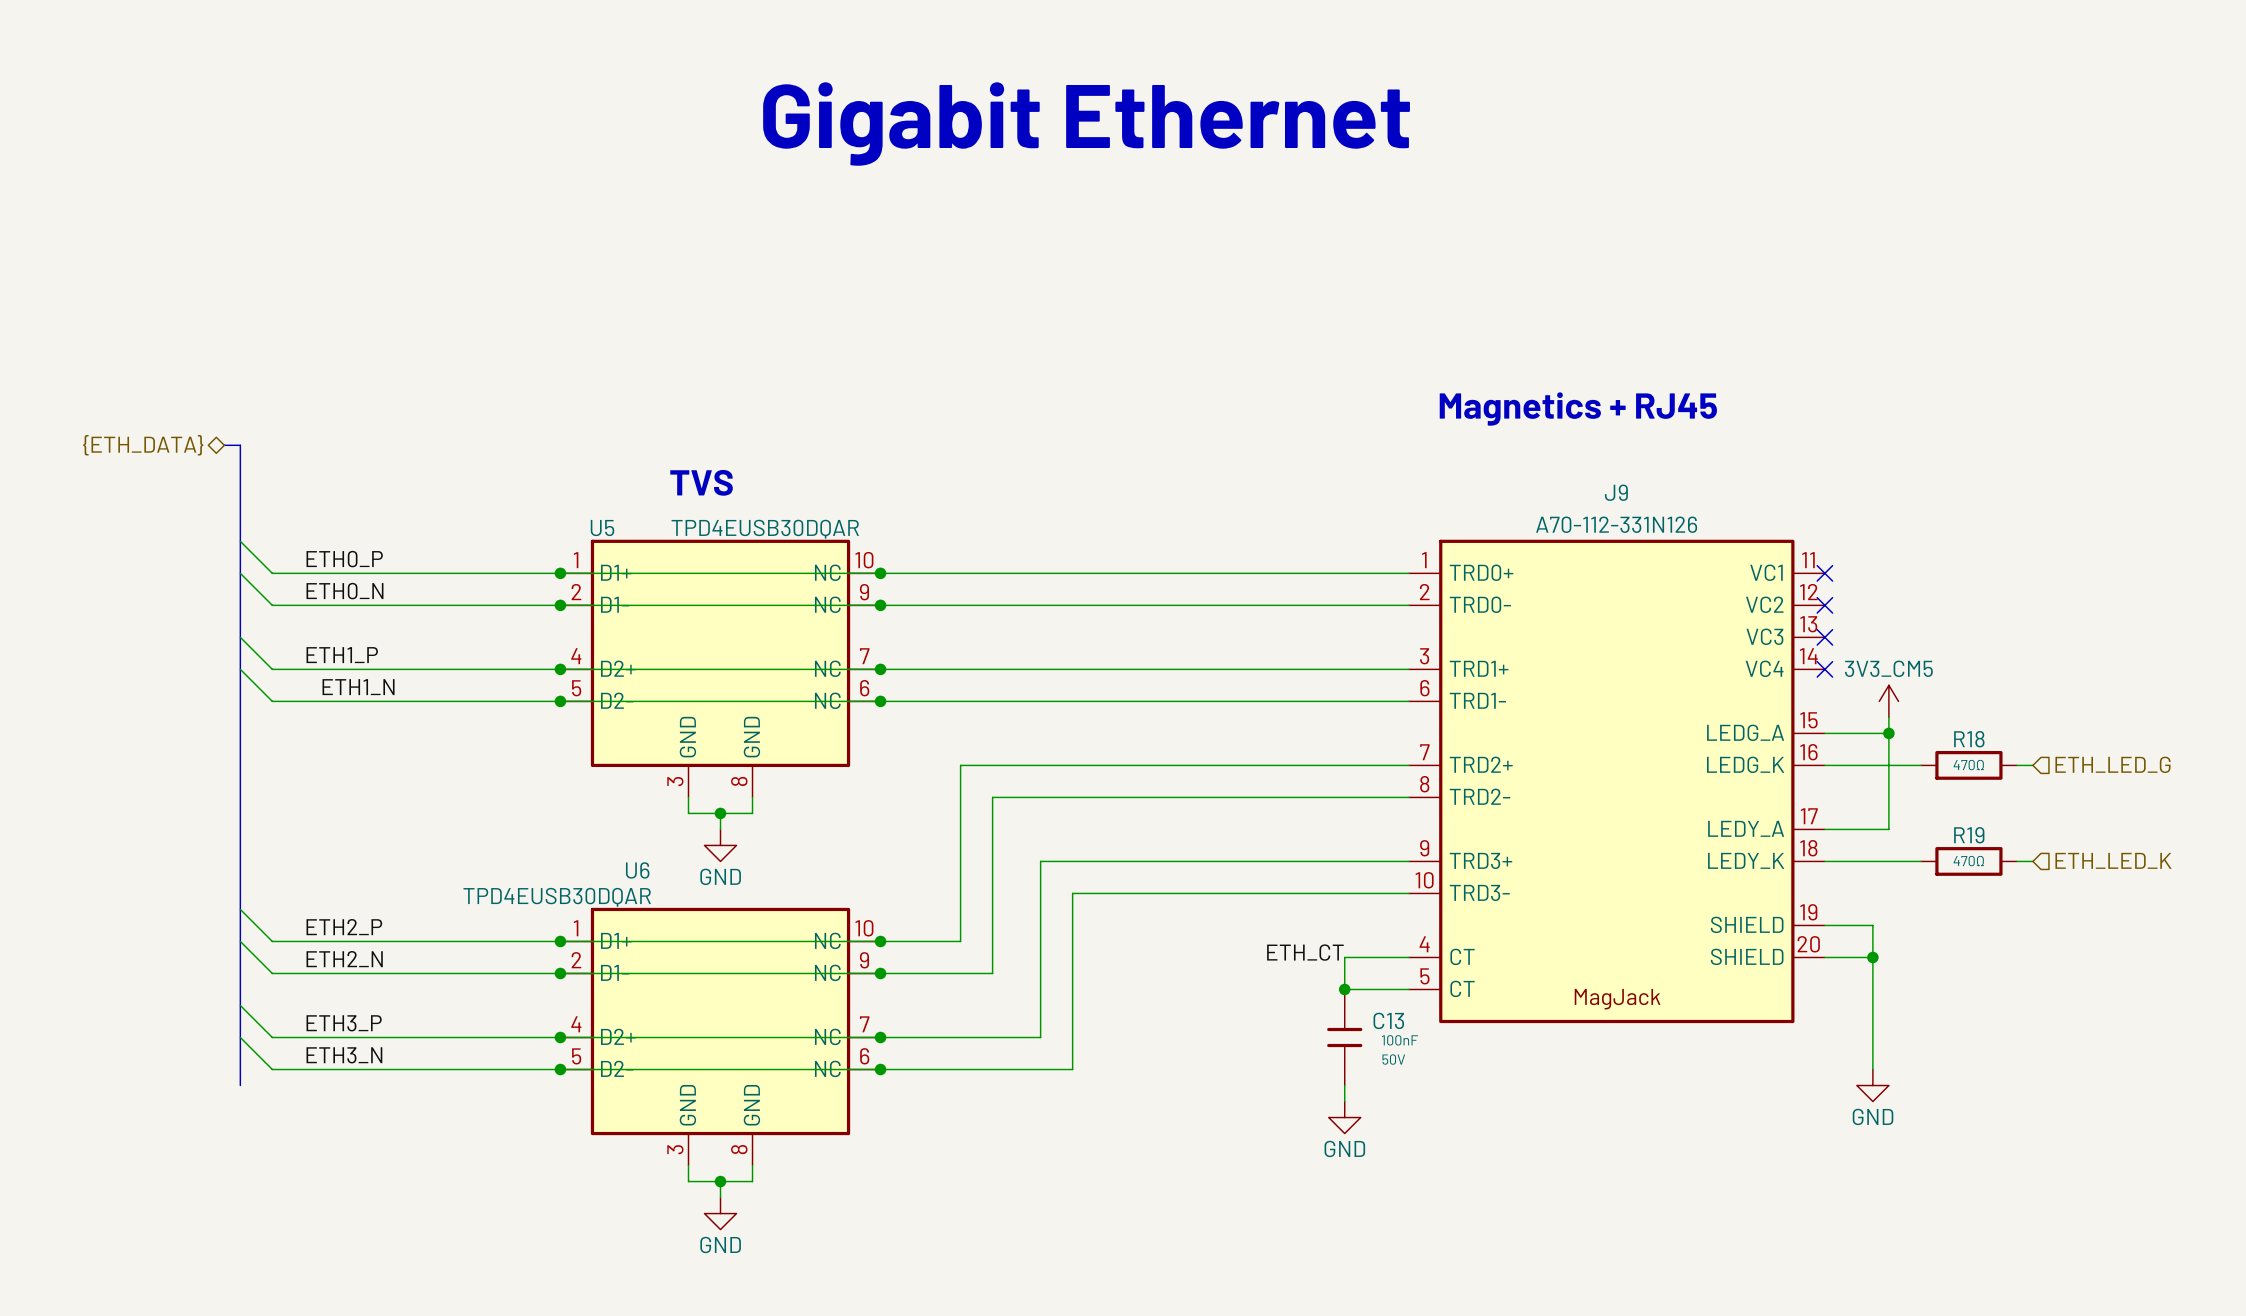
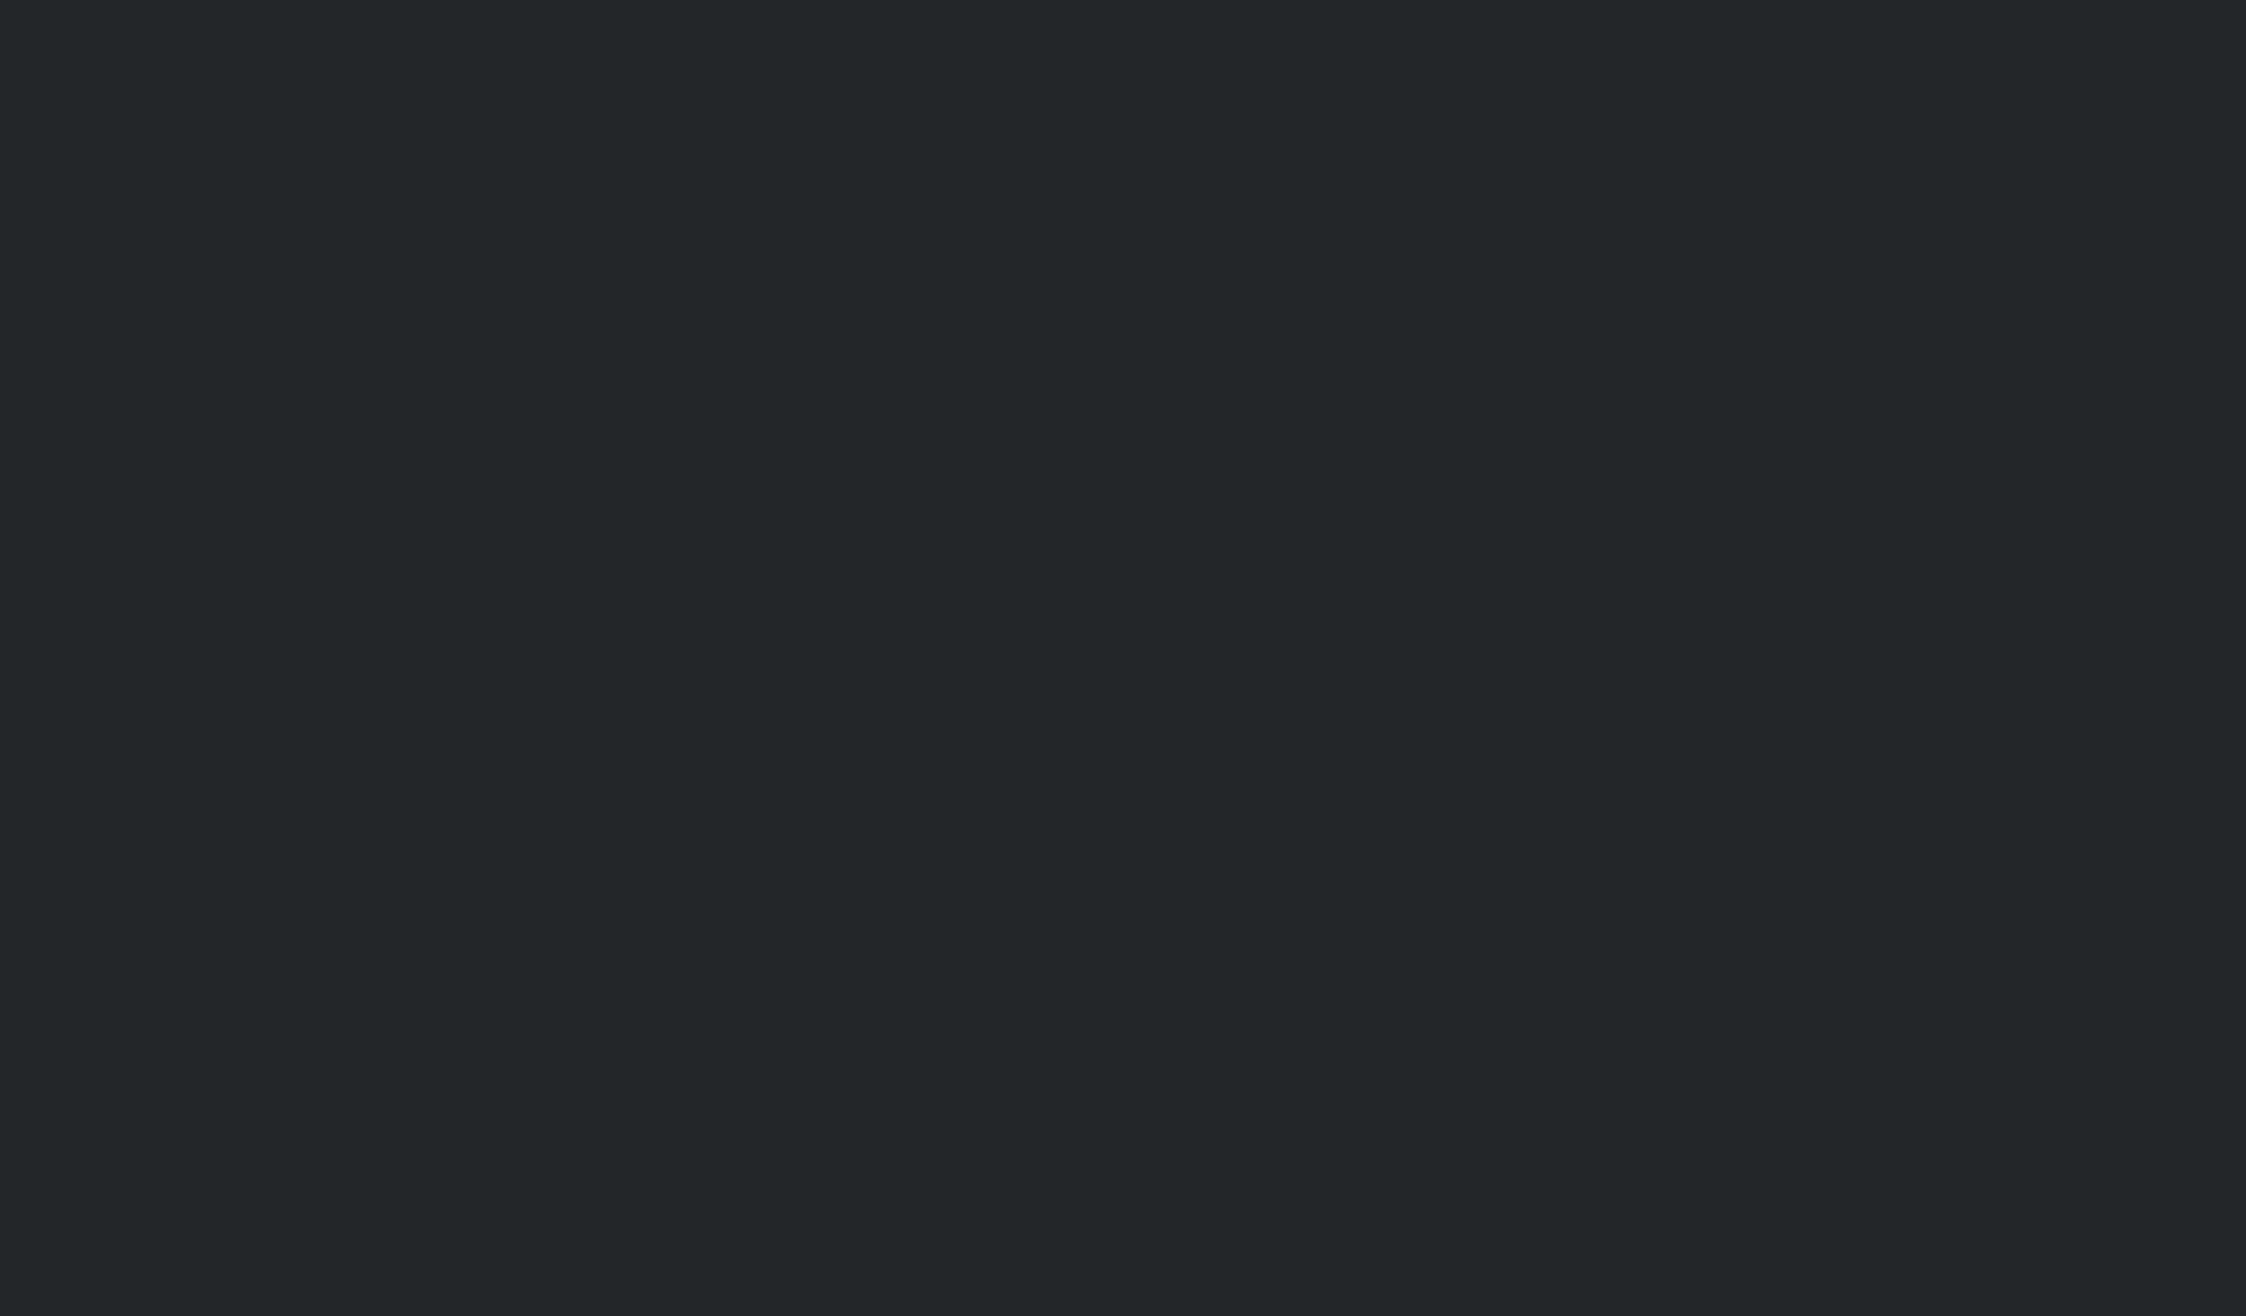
text: Gigabit Ethernet (1086, 124) -> none
text: Magnetics + RJ45 (1578, 409) -> none
hierarchical label: {ETH_DATA} (143, 445) -> none
bus: (224, 445) (240, 445) (240, 1085) -> none
text: TVS (701, 482) -> none
wire: (240, 541) (272, 573) (1408, 573) -> none
label: ETH0_P (344, 559) -> none
wire: (240, 573) (272, 605) (1408, 605) -> none
junction: (560, 573) -> none
junction: (880, 573) -> none
no-connect mark: (1824, 573) -> none
label: ETH0_N (344, 591) -> none
junction: (560, 605) -> none
junction: (880, 605) -> none
no-connect mark: (1824, 605) -> none
wire: (240, 637) (272, 669) (1408, 669) -> none
no-connect mark: (1824, 637) -> none
label: ETH1_P (342, 655) -> none
U5: TPD4EUSB30DQAR (720, 668) -> none
wire: (240, 669) (272, 701) (1408, 701) -> none
junction: (560, 669) -> none
junction: (880, 669) -> none
no-connect mark: (1824, 669) -> none
label: ETH1_N (358, 687) -> none
junction: (560, 701) -> none
junction: (880, 701) -> none
power symbol: 3V3_CM5 (1888, 701) -> none
wire: (1888, 717) (1888, 829) (1824, 829) -> none
wire: (1824, 733) (1888, 733) -> none
junction: (1888, 733) -> none
hierarchical label: ETH_LED_G (2112, 764) -> none
wire: (1408, 765) (960, 765) (960, 941) (272, 941) (240, 909) -> none
wire: (1824, 765) (1920, 765) -> none
R18: 470Ω (1968, 765) -> none
wire: (2016, 765) (2032, 765) -> none
J9: A70-112-331N126 (1616, 781) -> none
wire: (688, 797) (688, 813) (752, 813) (752, 797) -> none
wire: (1408, 797) (992, 797) (992, 973) (272, 973) (240, 941) -> none
wire: (720, 813) (720, 829) -> none
junction: (720, 813) -> none
power symbol: GND (720, 845) -> none
hierarchical label: ETH_LED_K (2113, 860) -> none
wire: (1408, 861) (1040, 861) (1040, 1037) (272, 1037) (240, 1005) -> none
wire: (1824, 861) (1920, 861) -> none
R19: 470Ω (1968, 861) -> none
wire: (2016, 861) (2032, 861) -> none
wire: (1408, 893) (1072, 893) (1072, 1069) (272, 1069) (240, 1037) -> none
wire: (1824, 925) (1872, 925) (1872, 1069) -> none
label: ETH2_P (344, 927) -> none
junction: (560, 941) -> none
junction: (880, 941) -> none
label: ETH_CT (1305, 952) -> none
wire: (1408, 957) (1344, 957) (1344, 989) (1408, 989) -> none
wire: (1824, 957) (1872, 957) -> none
junction: (1872, 957) -> none
label: ETH2_N (344, 959) -> none
junction: (560, 973) -> none
junction: (880, 973) -> none
junction: (1344, 989) -> none
label: ETH3_P (344, 1023) -> none
U6: TPD4EUSB30DQAR (720, 1036) -> none
junction: (560, 1037) -> none
junction: (880, 1037) -> none
C13: 100nF (1344, 1037) -> none
label: ETH3_N (344, 1055) -> none
junction: (560, 1069) -> none
junction: (880, 1069) -> none
wire: (1344, 1085) (1344, 1101) -> none
power symbol: GND (1872, 1085) -> none
power symbol: GND (1344, 1117) -> none
wire: (688, 1165) (688, 1181) (752, 1181) (752, 1165) -> none
wire: (720, 1181) (720, 1197) -> none
junction: (720, 1181) -> none
power symbol: GND (720, 1213) -> none

